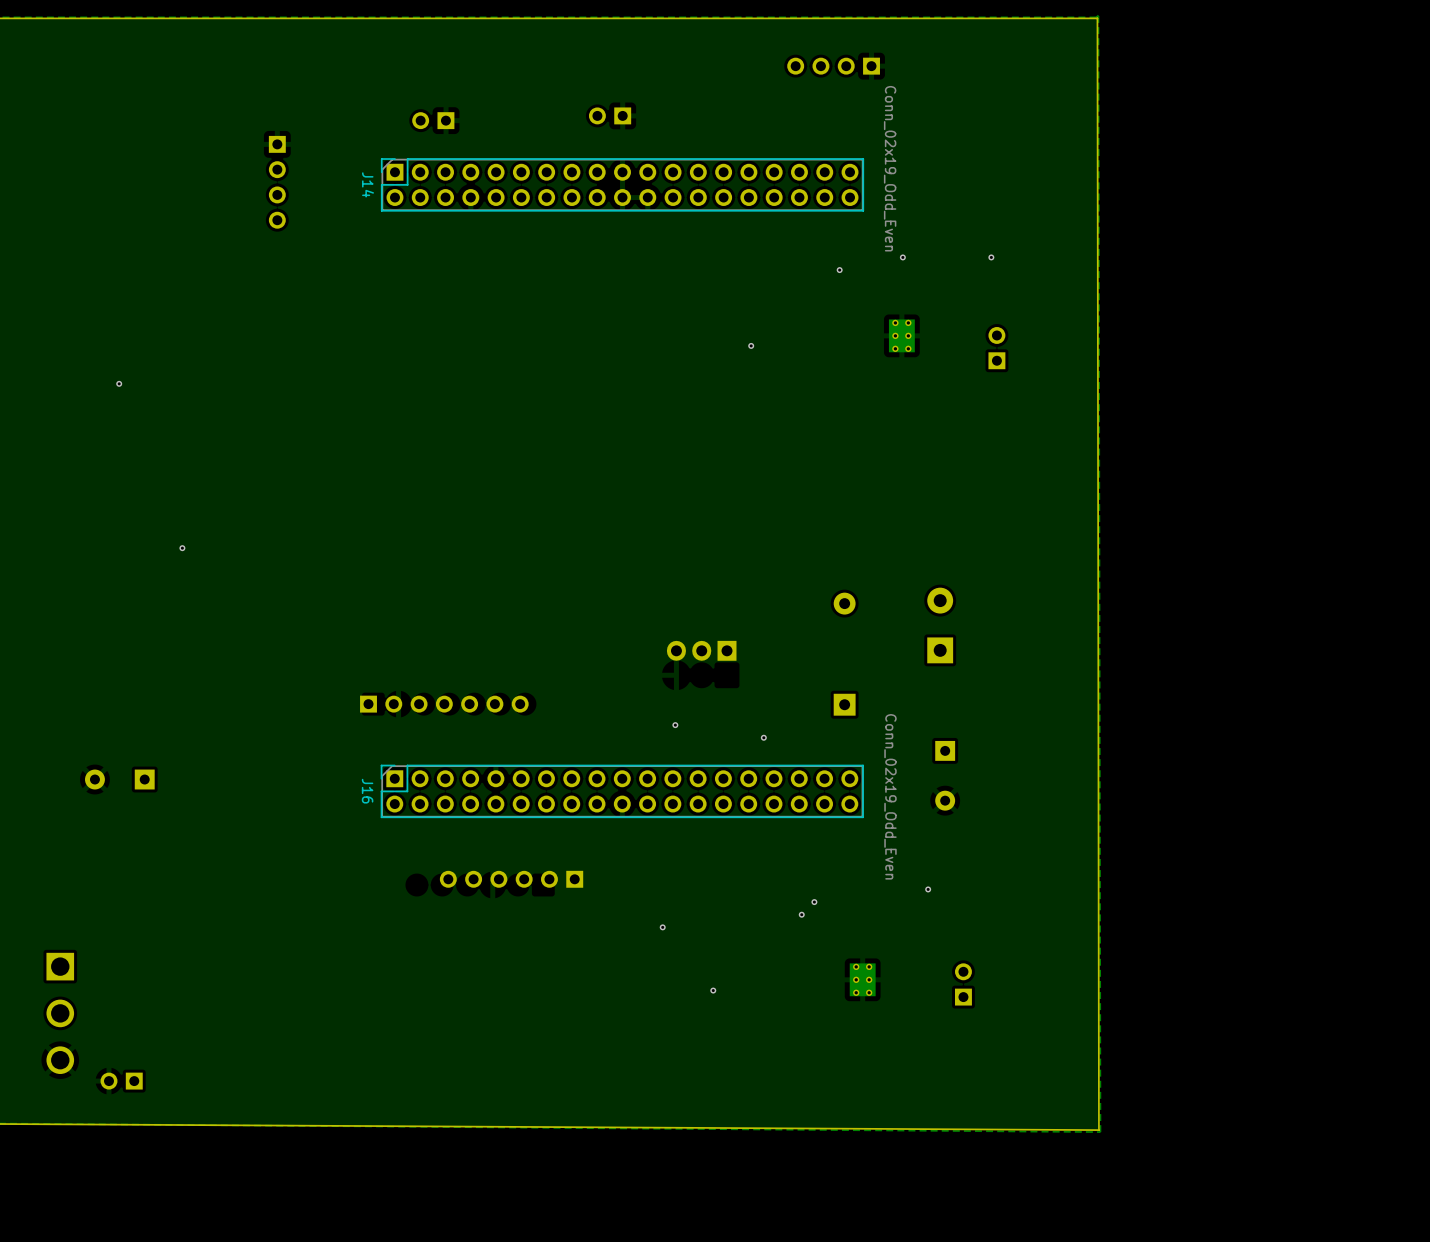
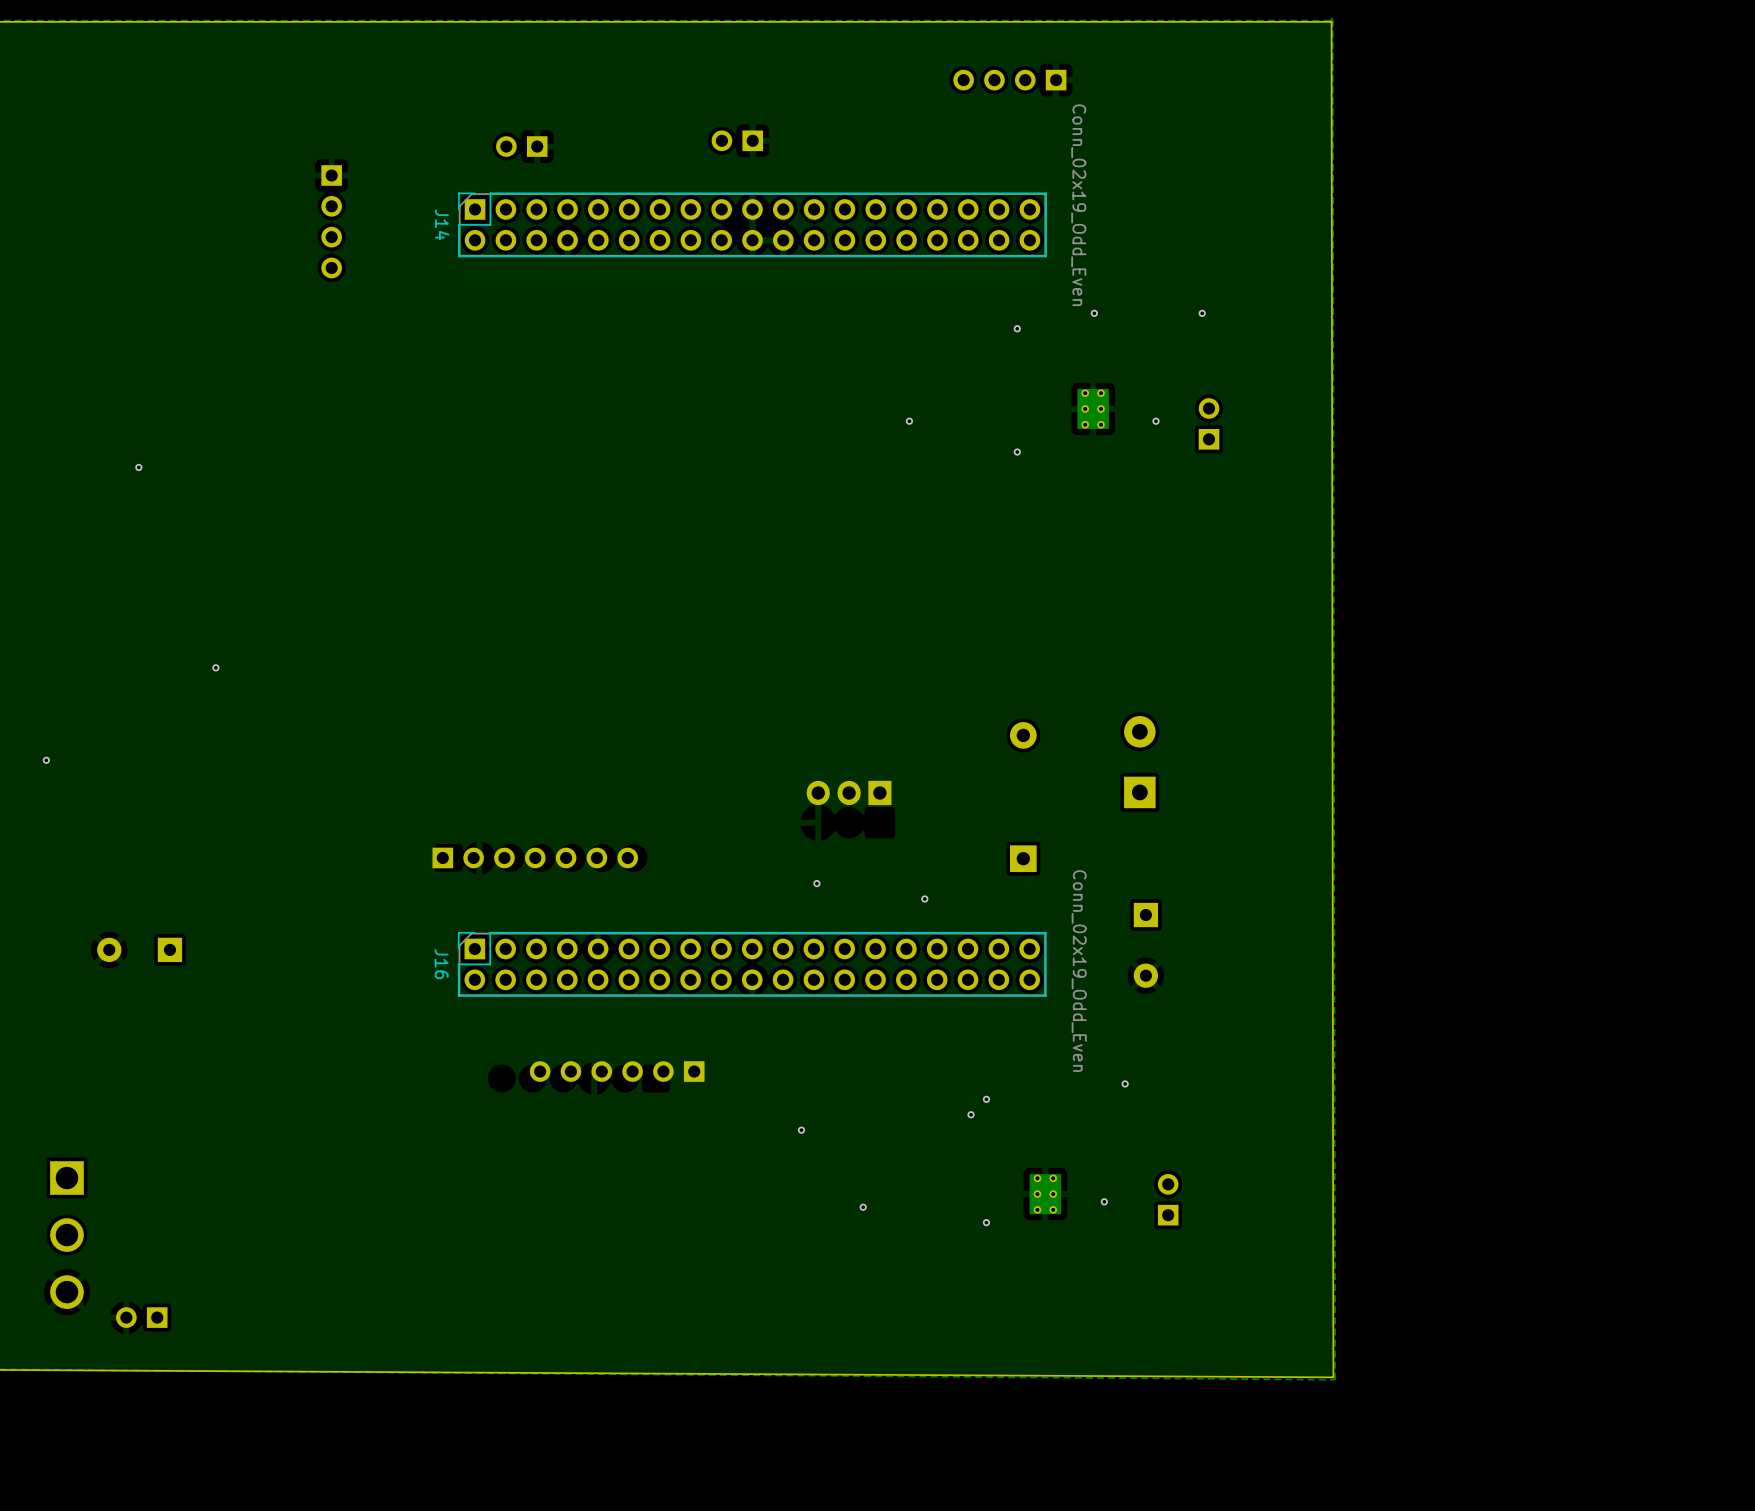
via: none -> (1155, 421)
via: none -> (1017, 452)
via: none -> (46, 760)
via: none -> (1104, 1201)
via: none -> (986, 1222)

